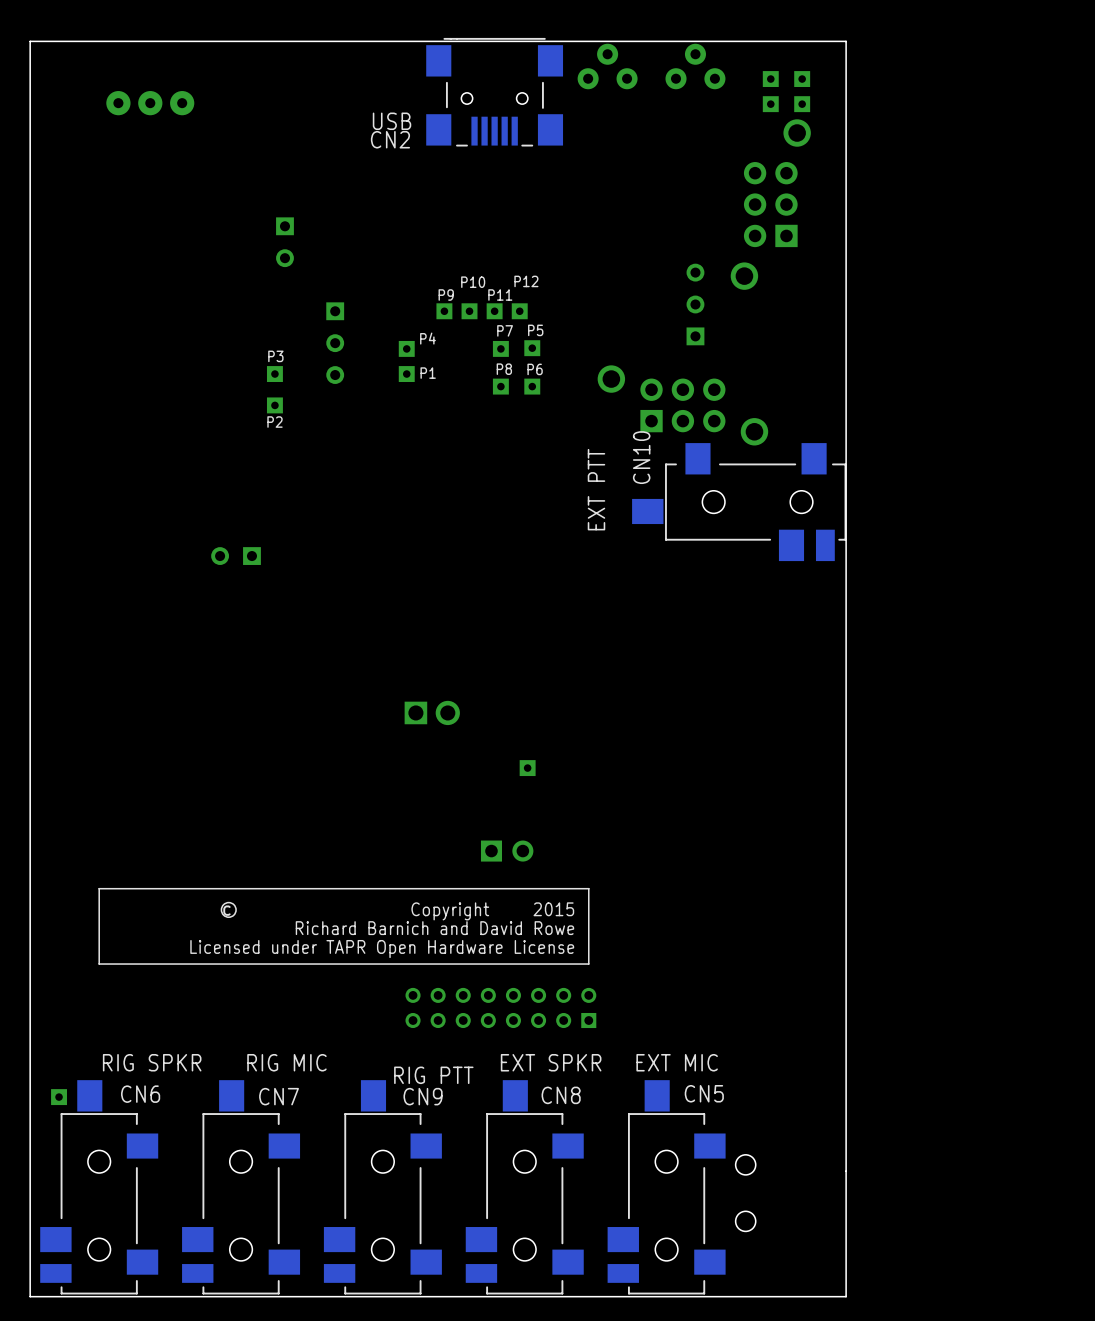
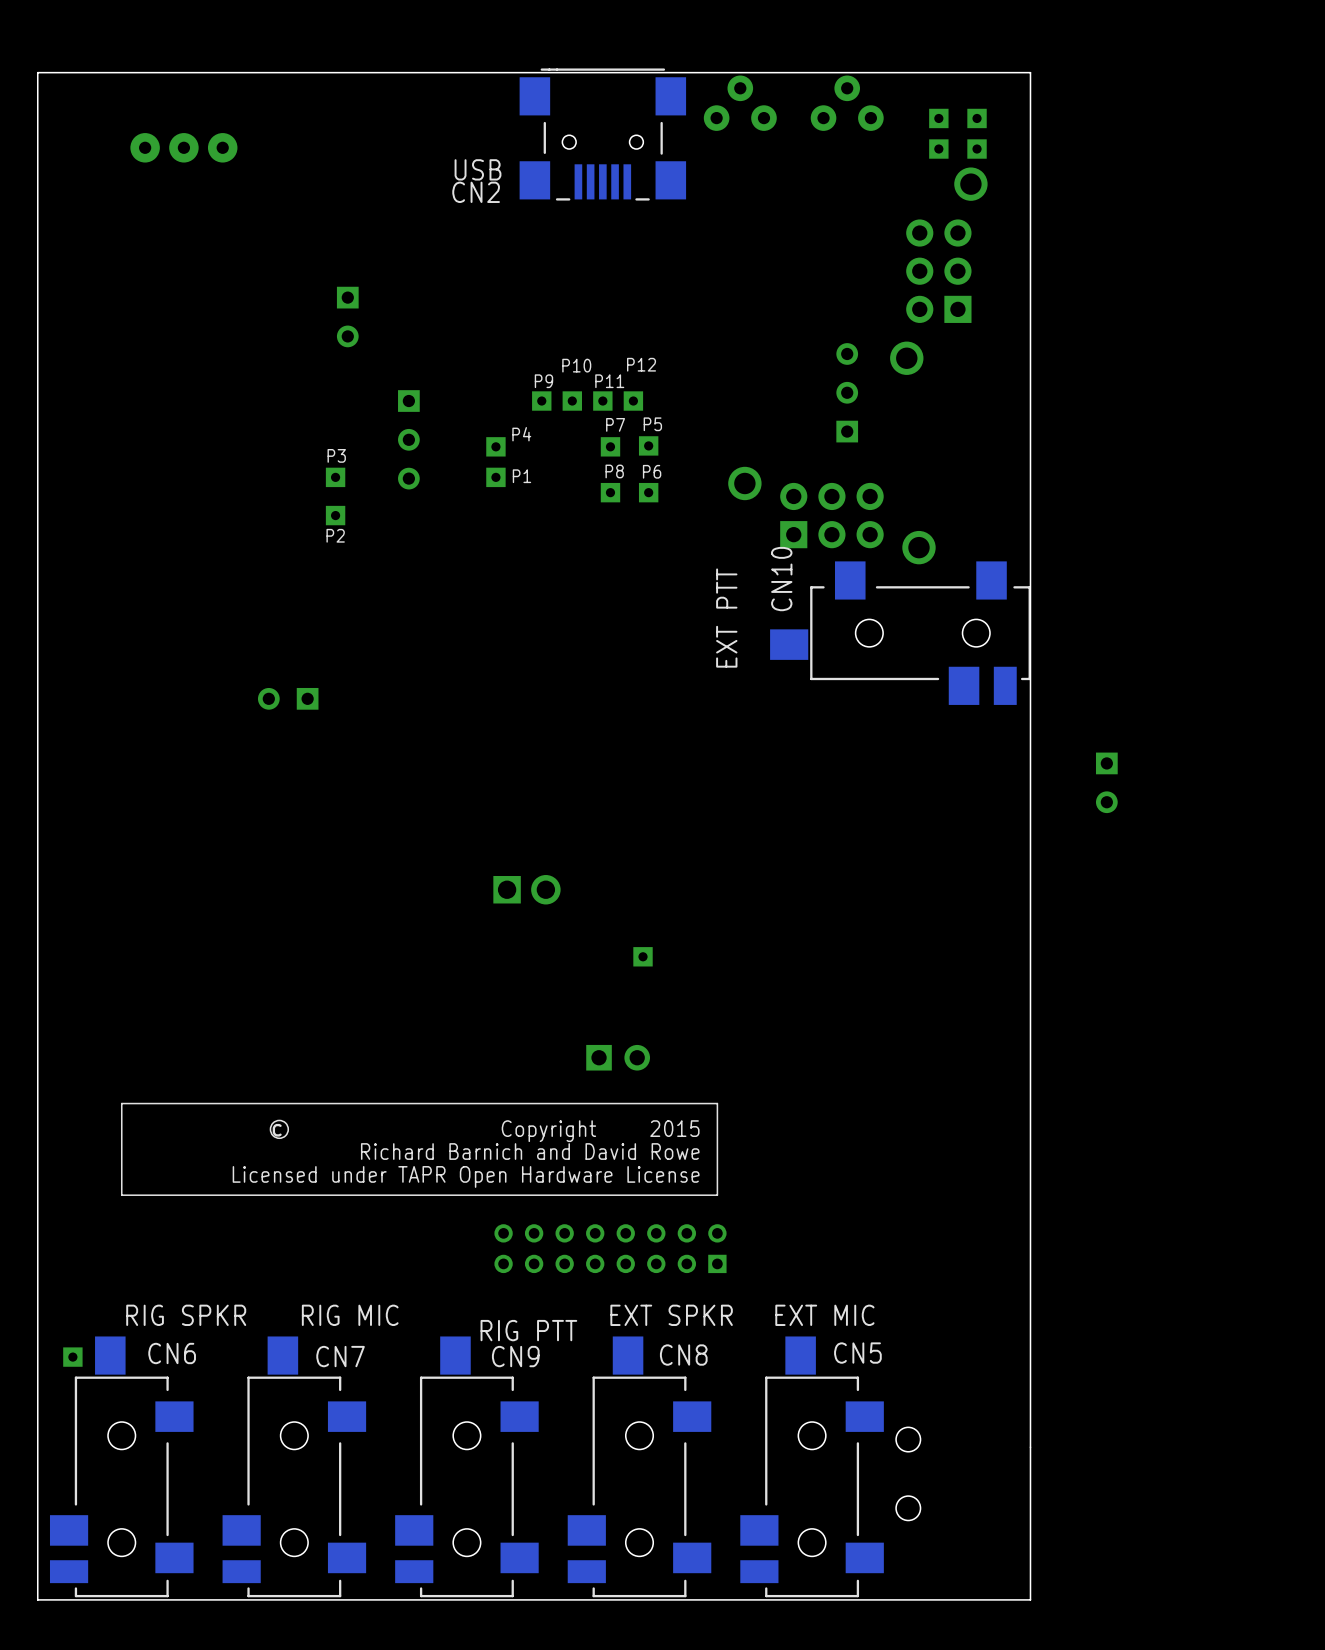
part: none -> (1106, 782)

